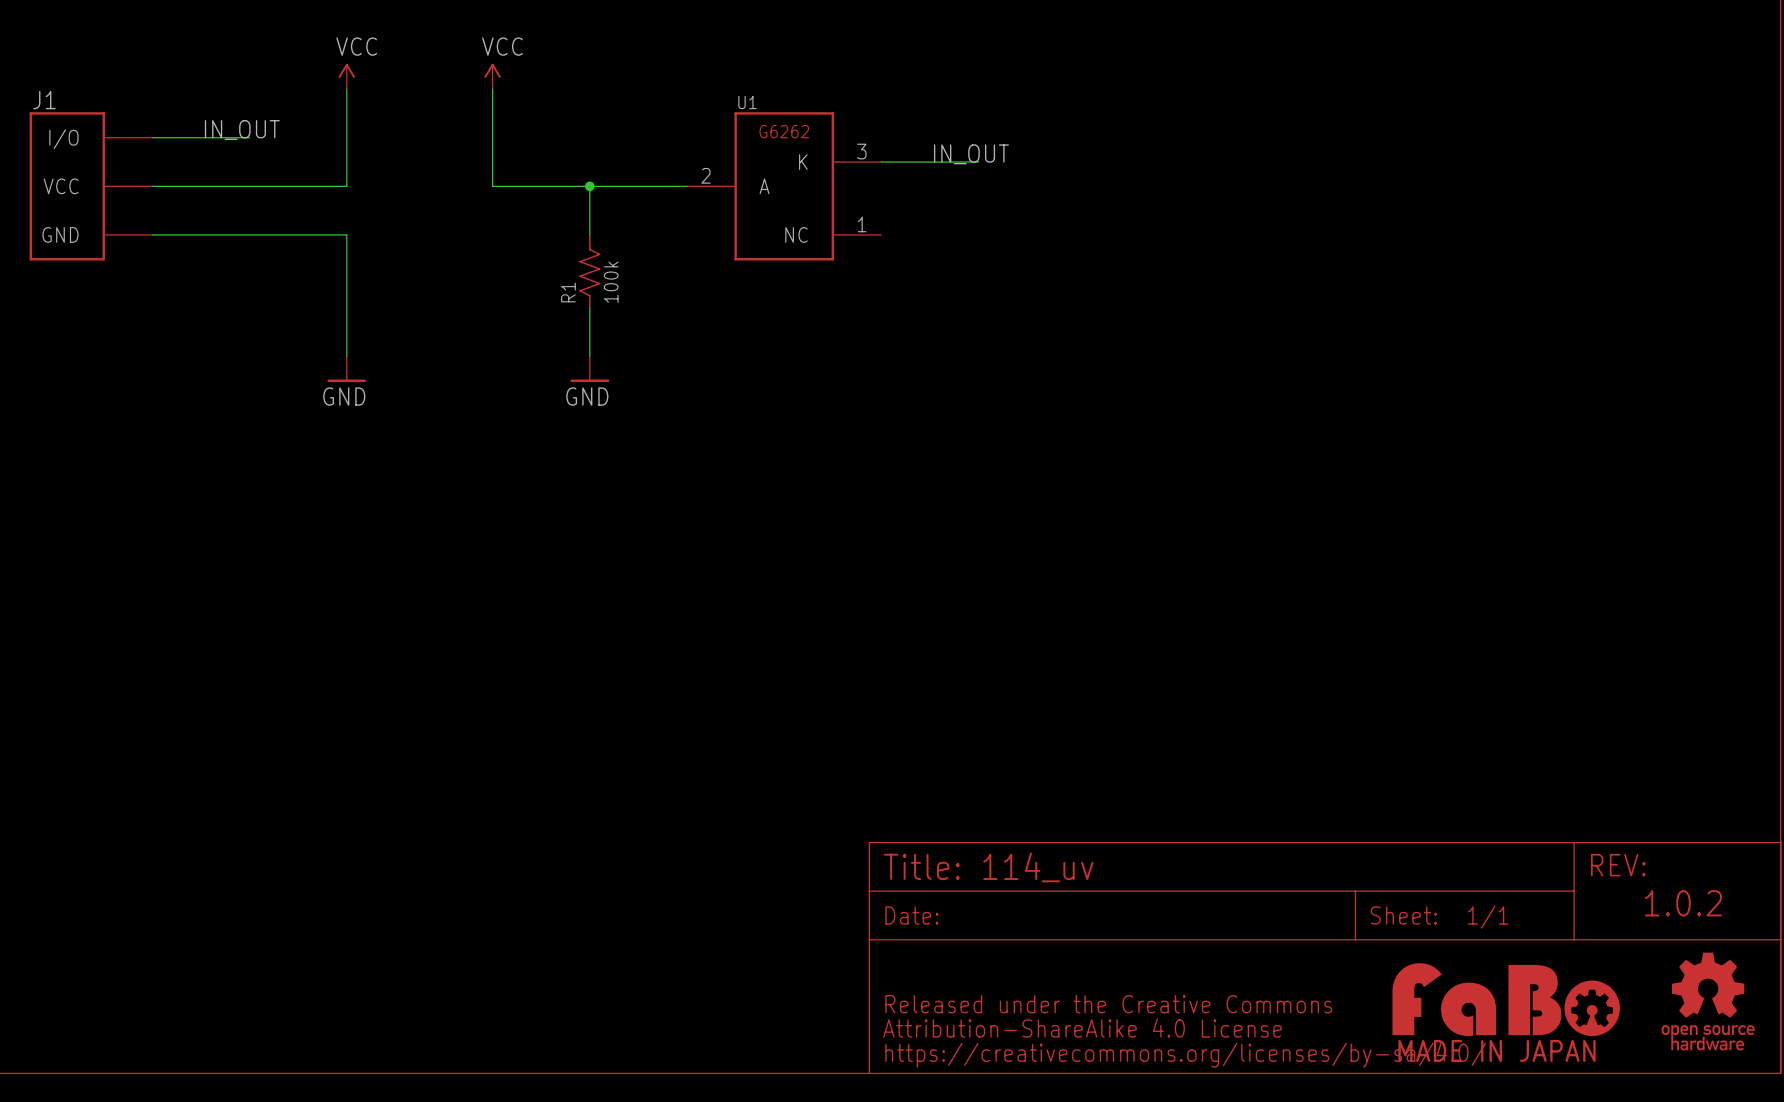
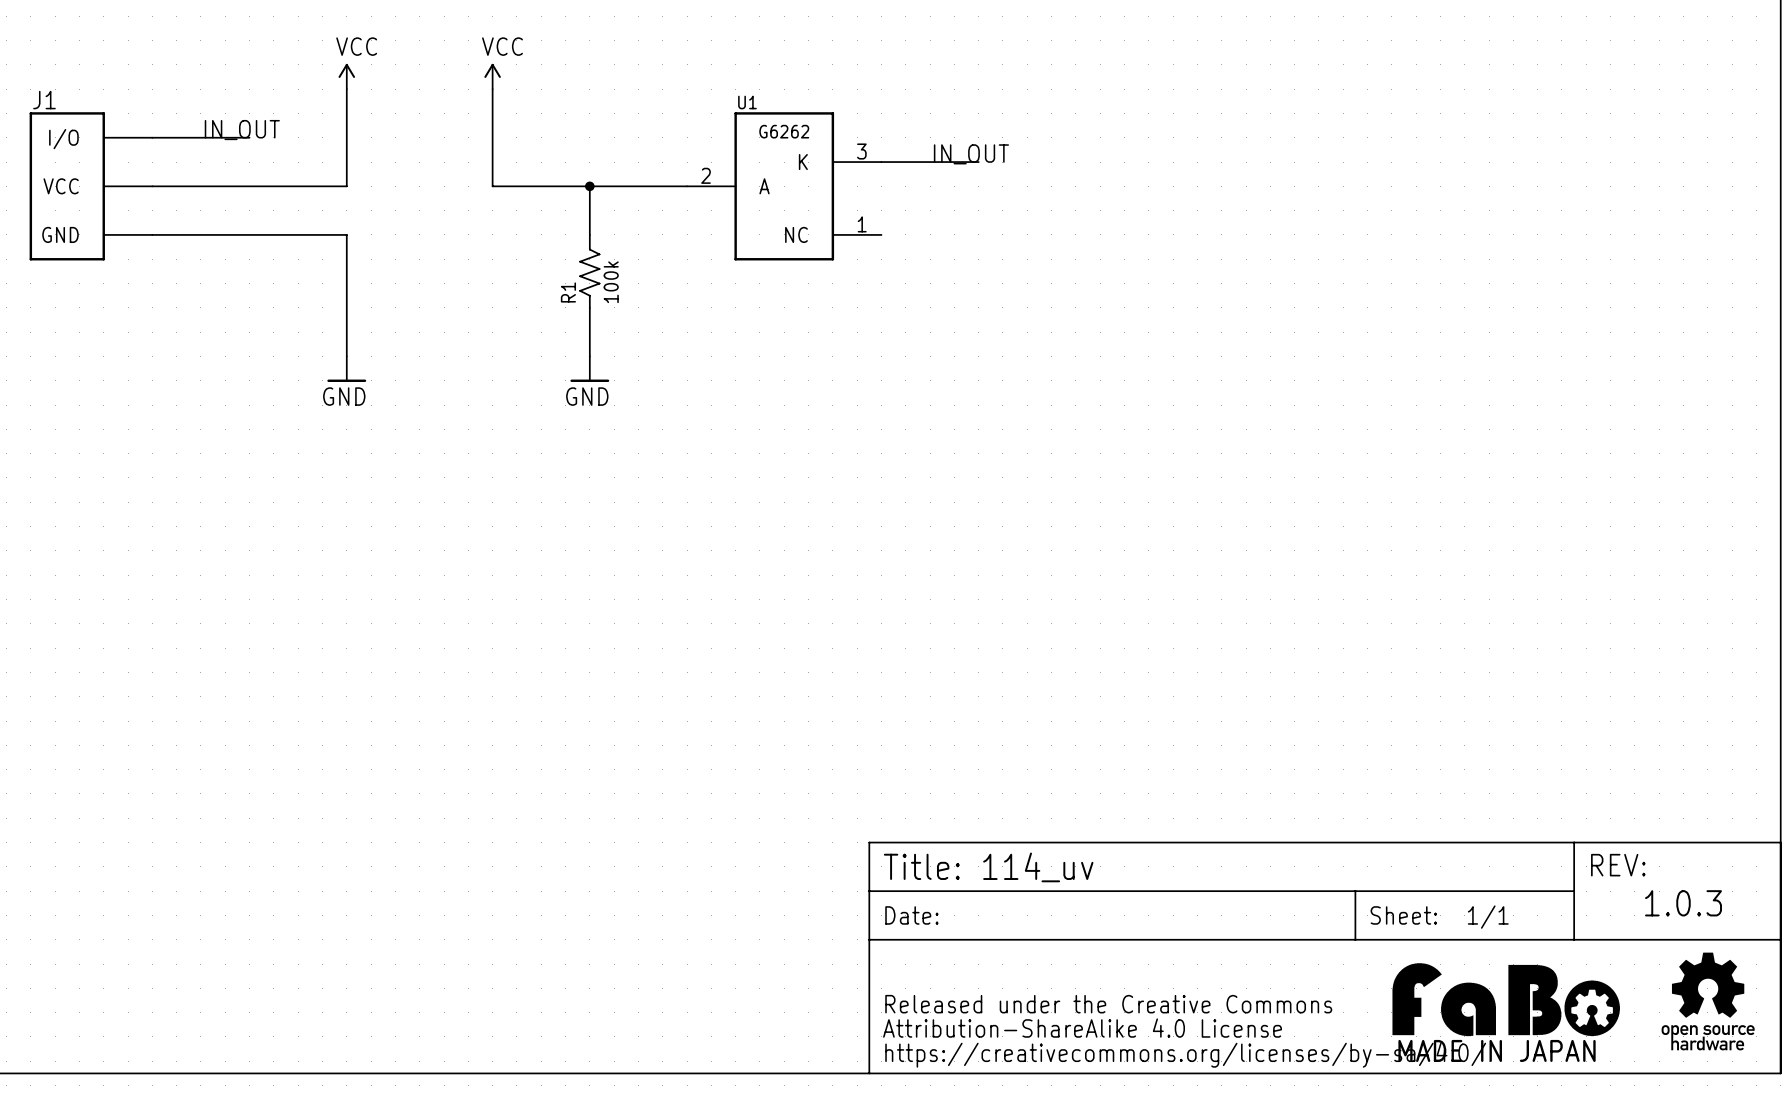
text: 1.0.2 (1683, 903) -> 1.0.3 (1683, 903)

